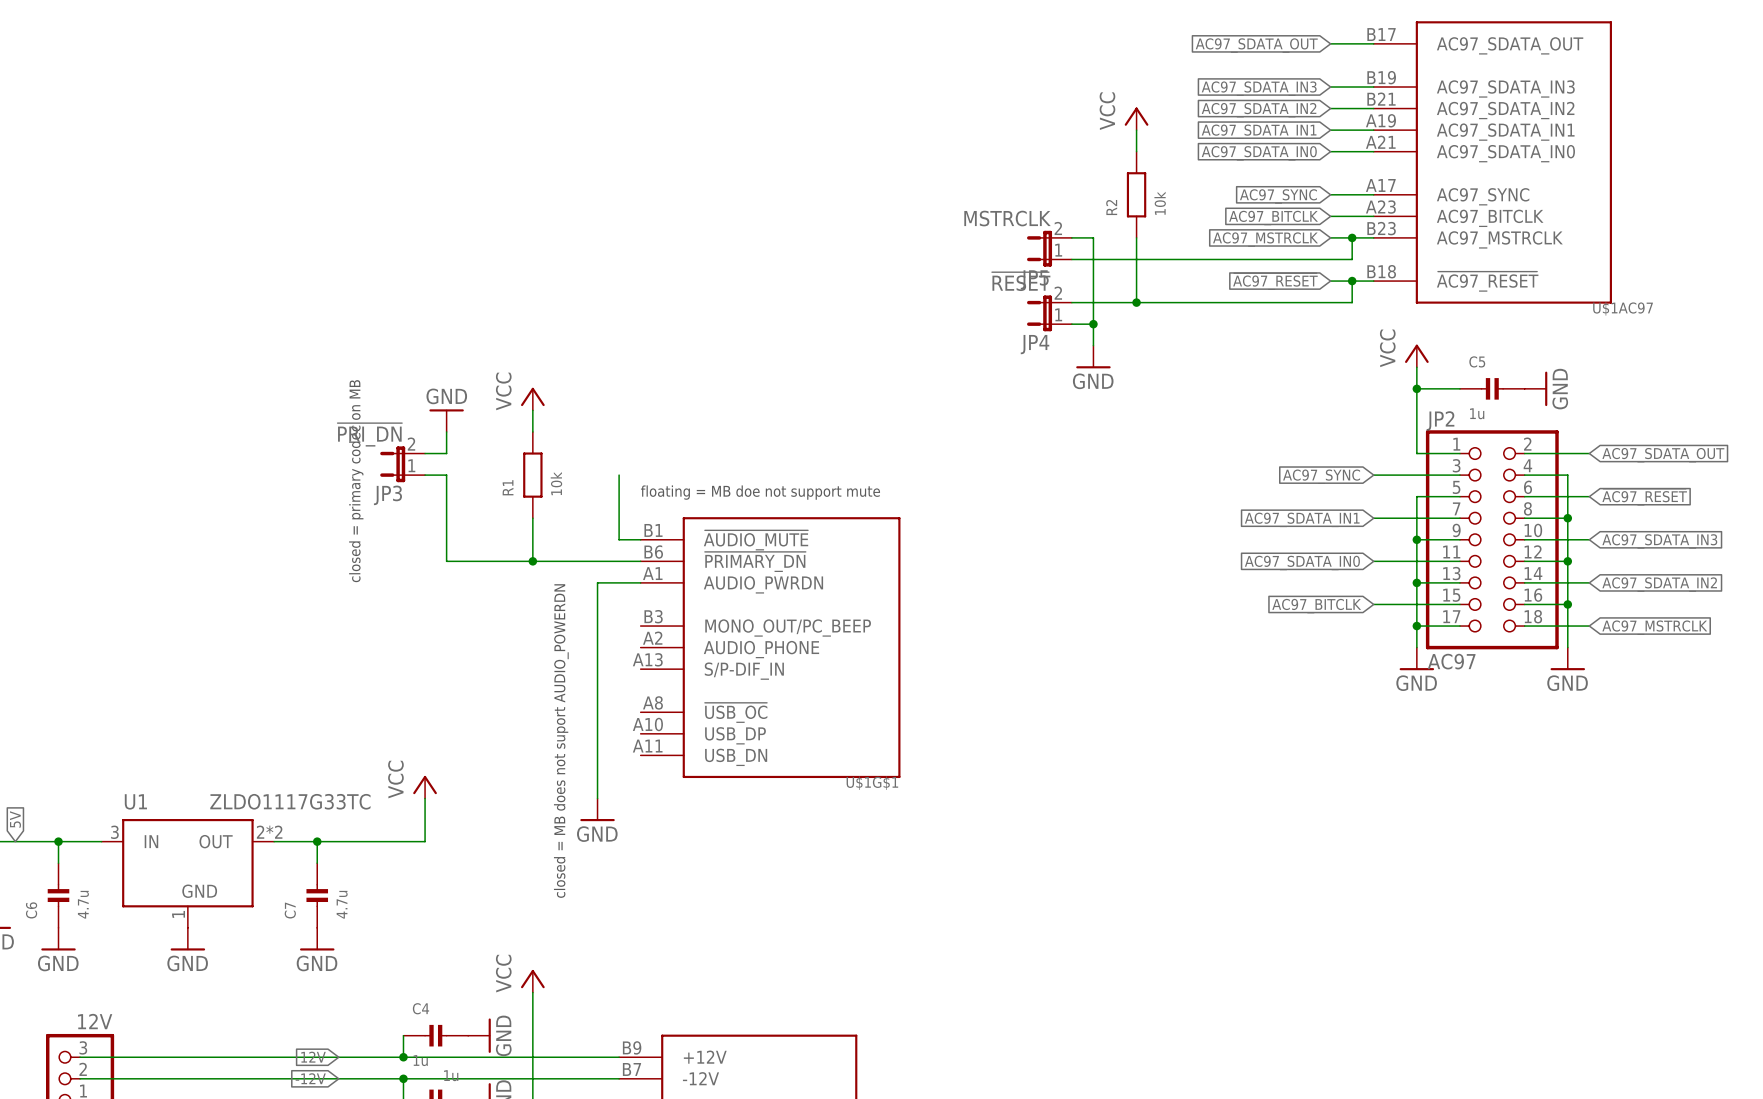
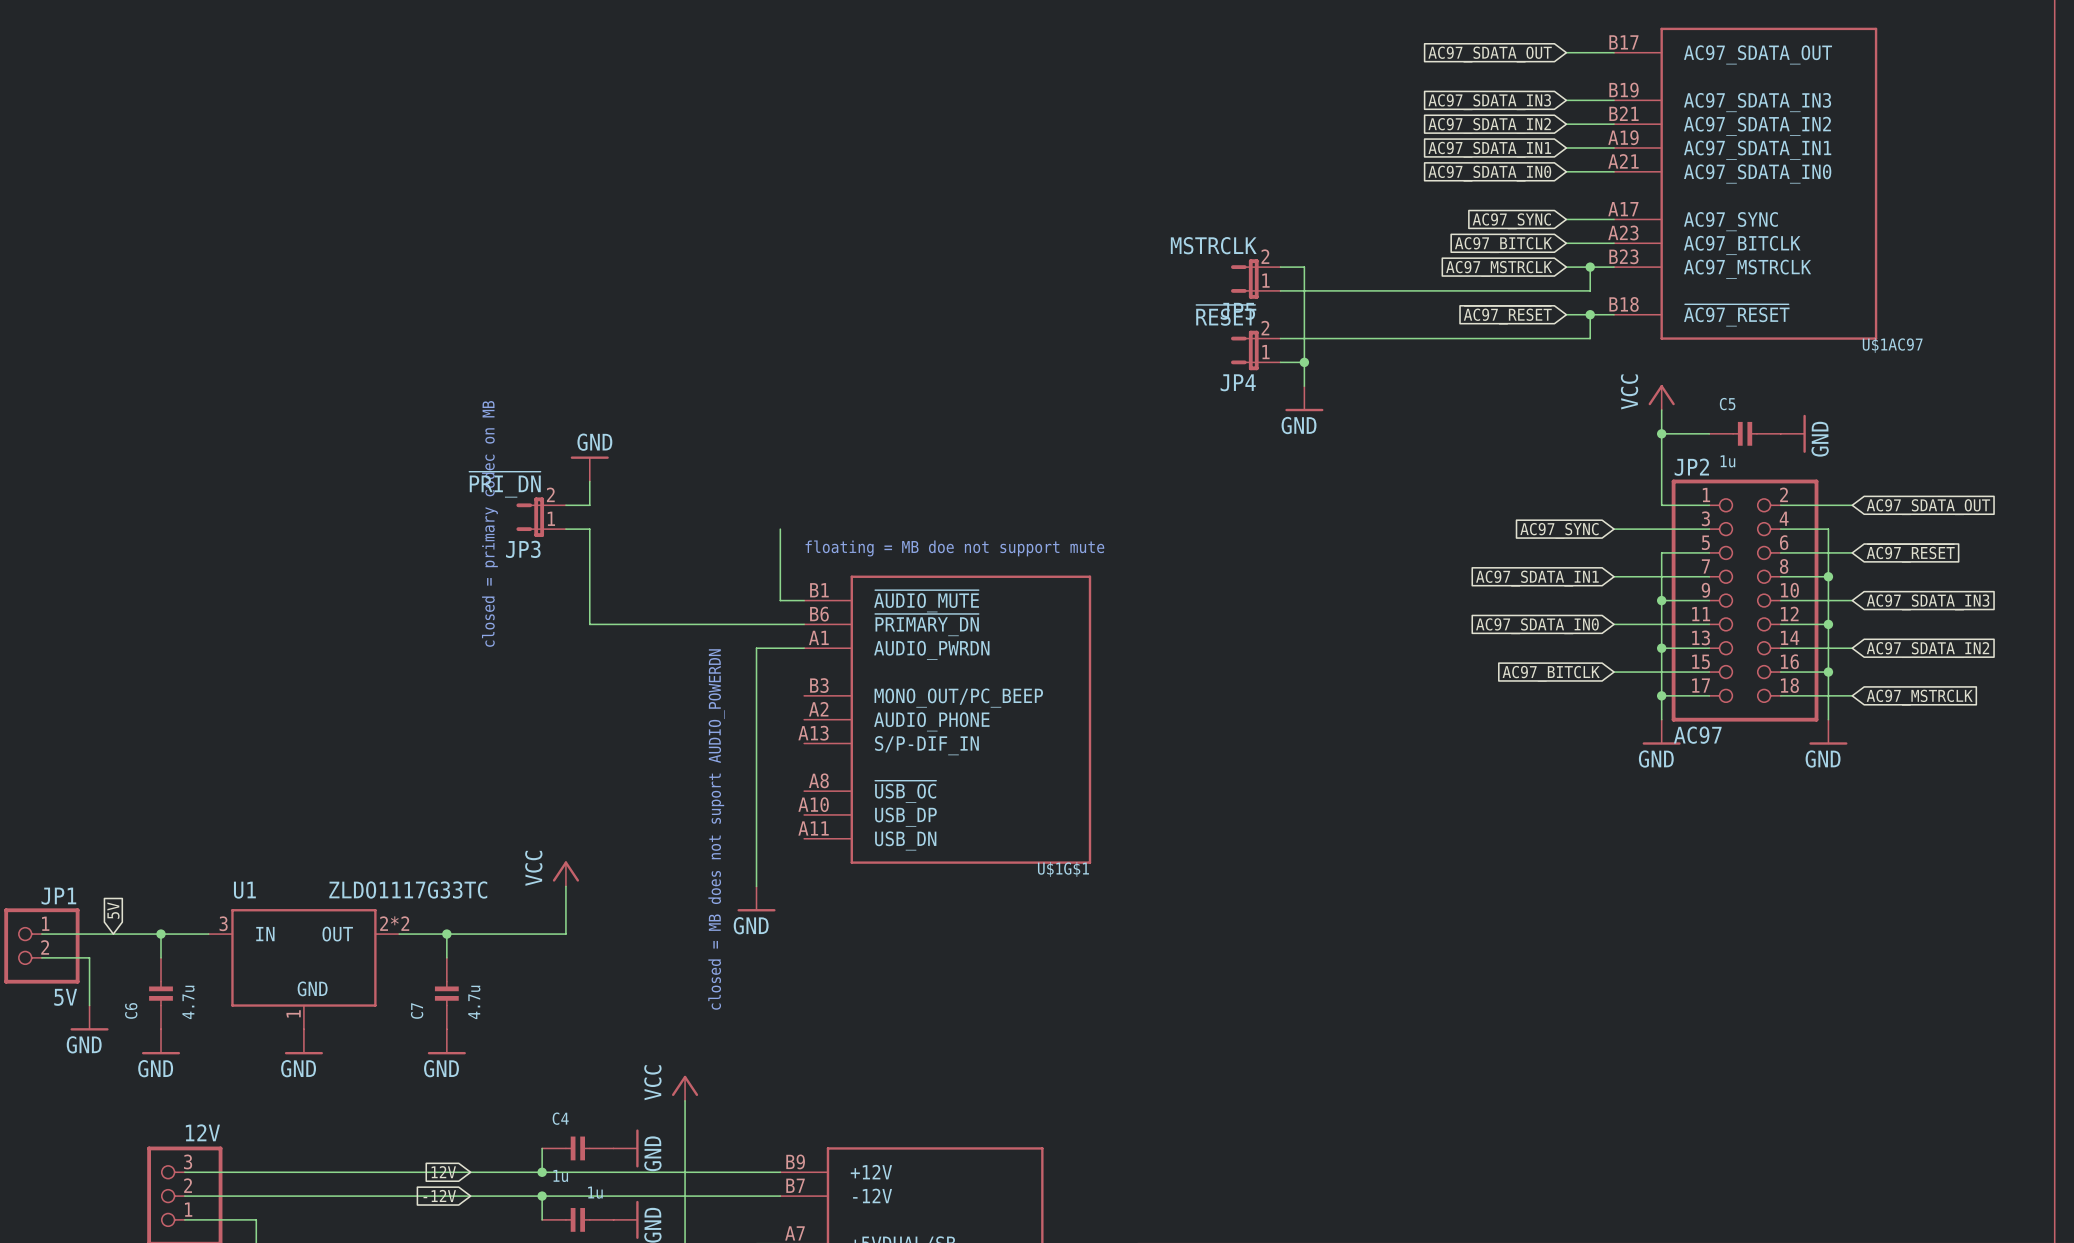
power symbol: VCC (1136, 118) -> none
wire: (1136, 130) (1136, 151) -> none
R2: 10k (1136, 194) -> none
wire: (1136, 237) (1136, 302) -> none
junction: (1136, 302) -> none
power symbol: VCC (532, 399) -> none
wire: (532, 410) (532, 431) -> none
R1: 10k (532, 475) -> none
wire: (532, 518) (532, 561) -> none
junction: (532, 561) -> none

